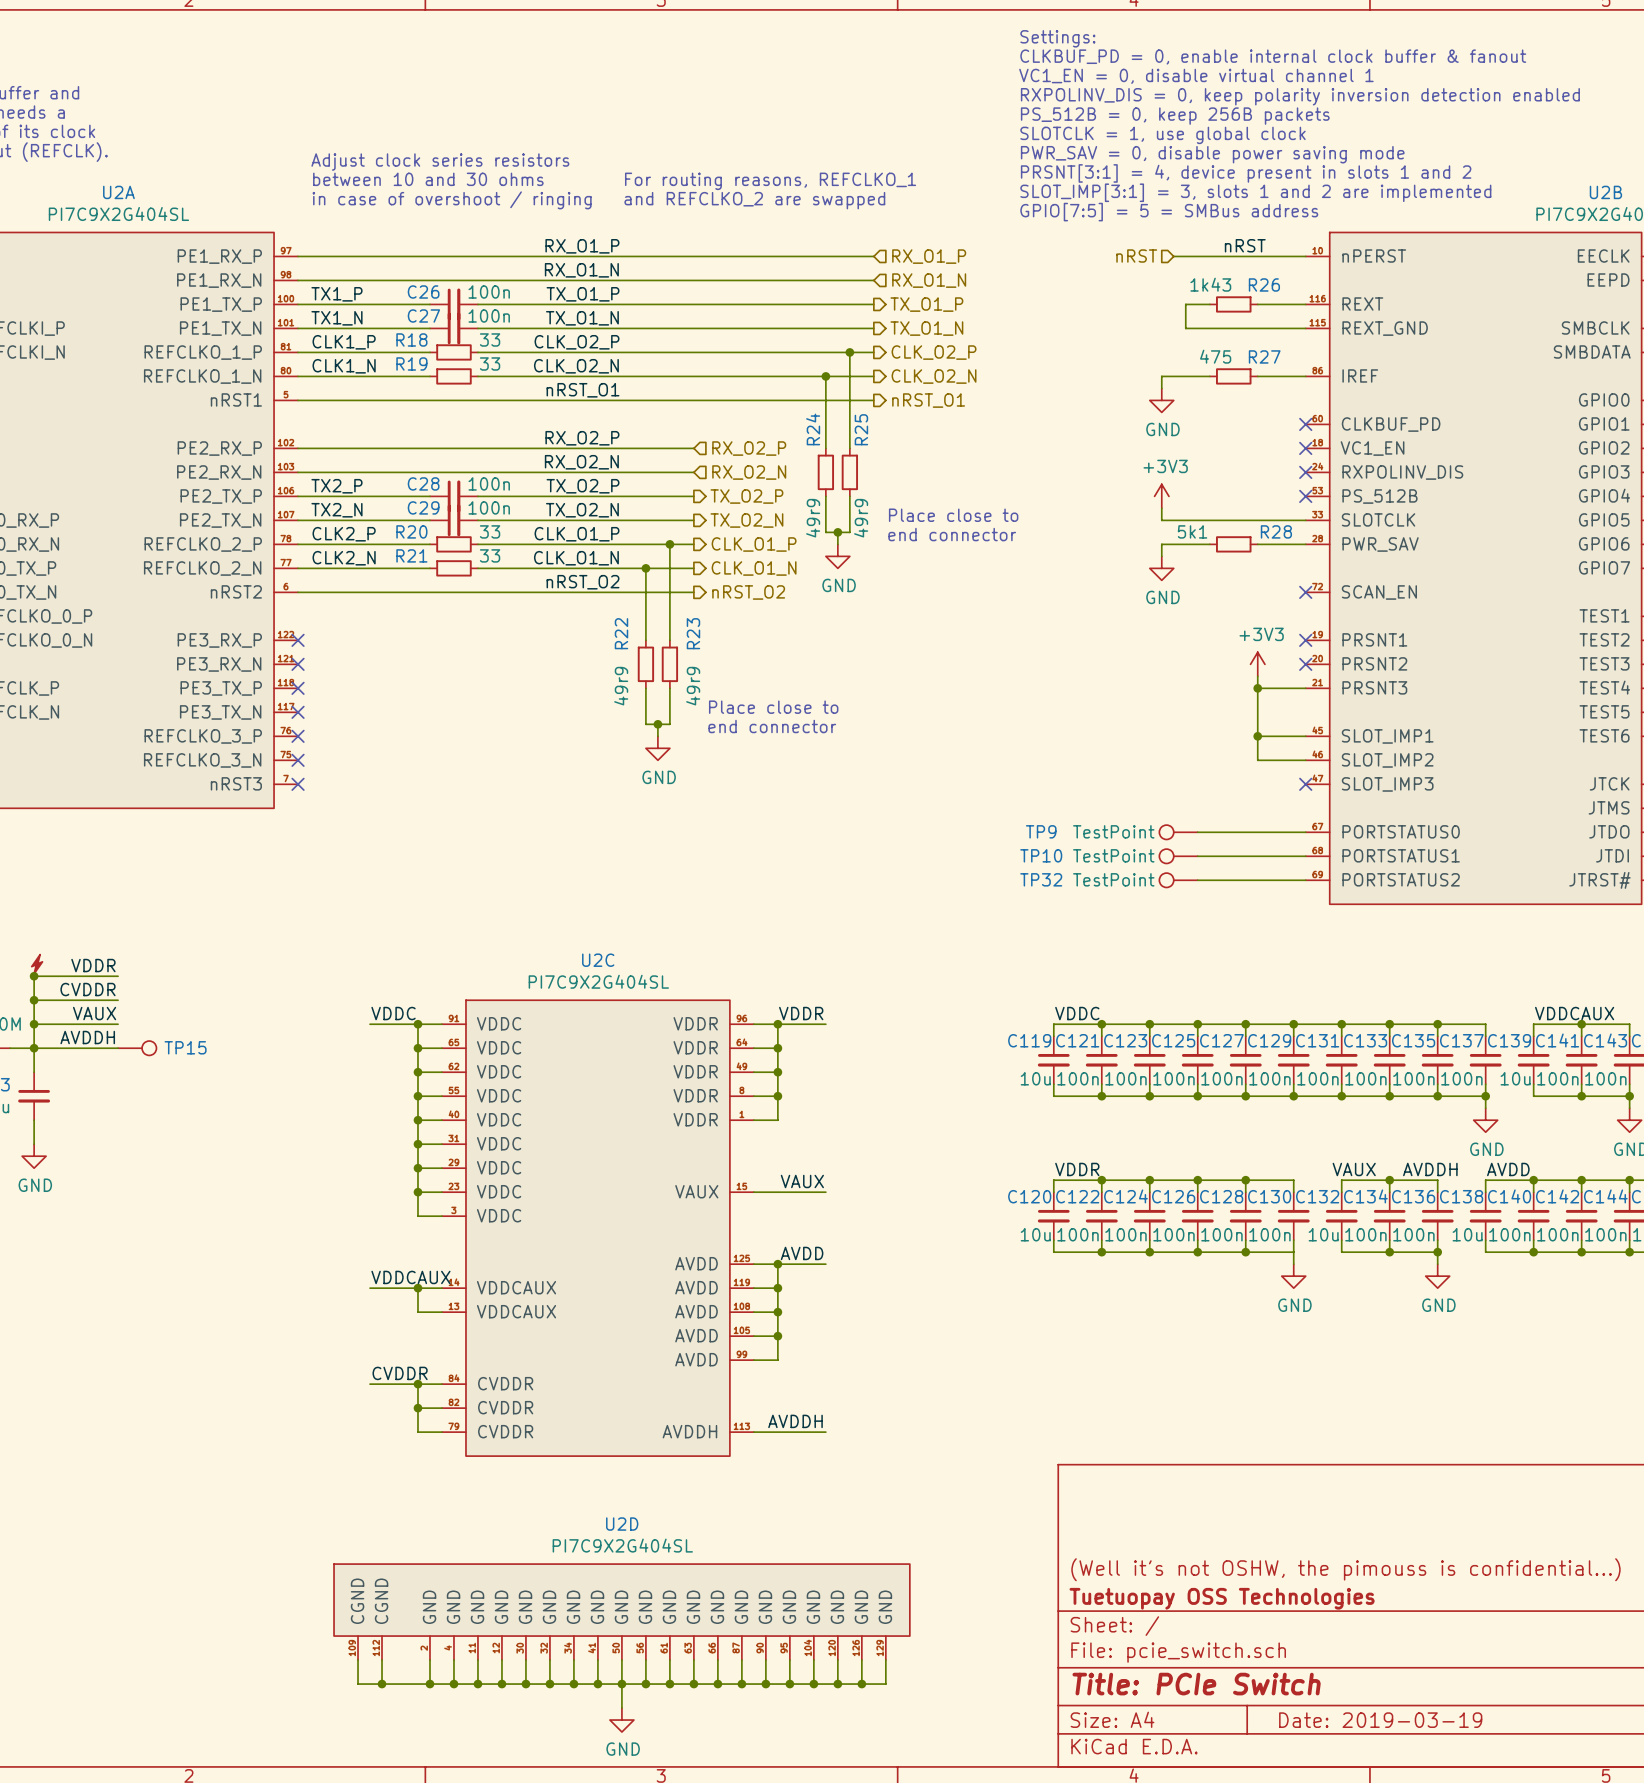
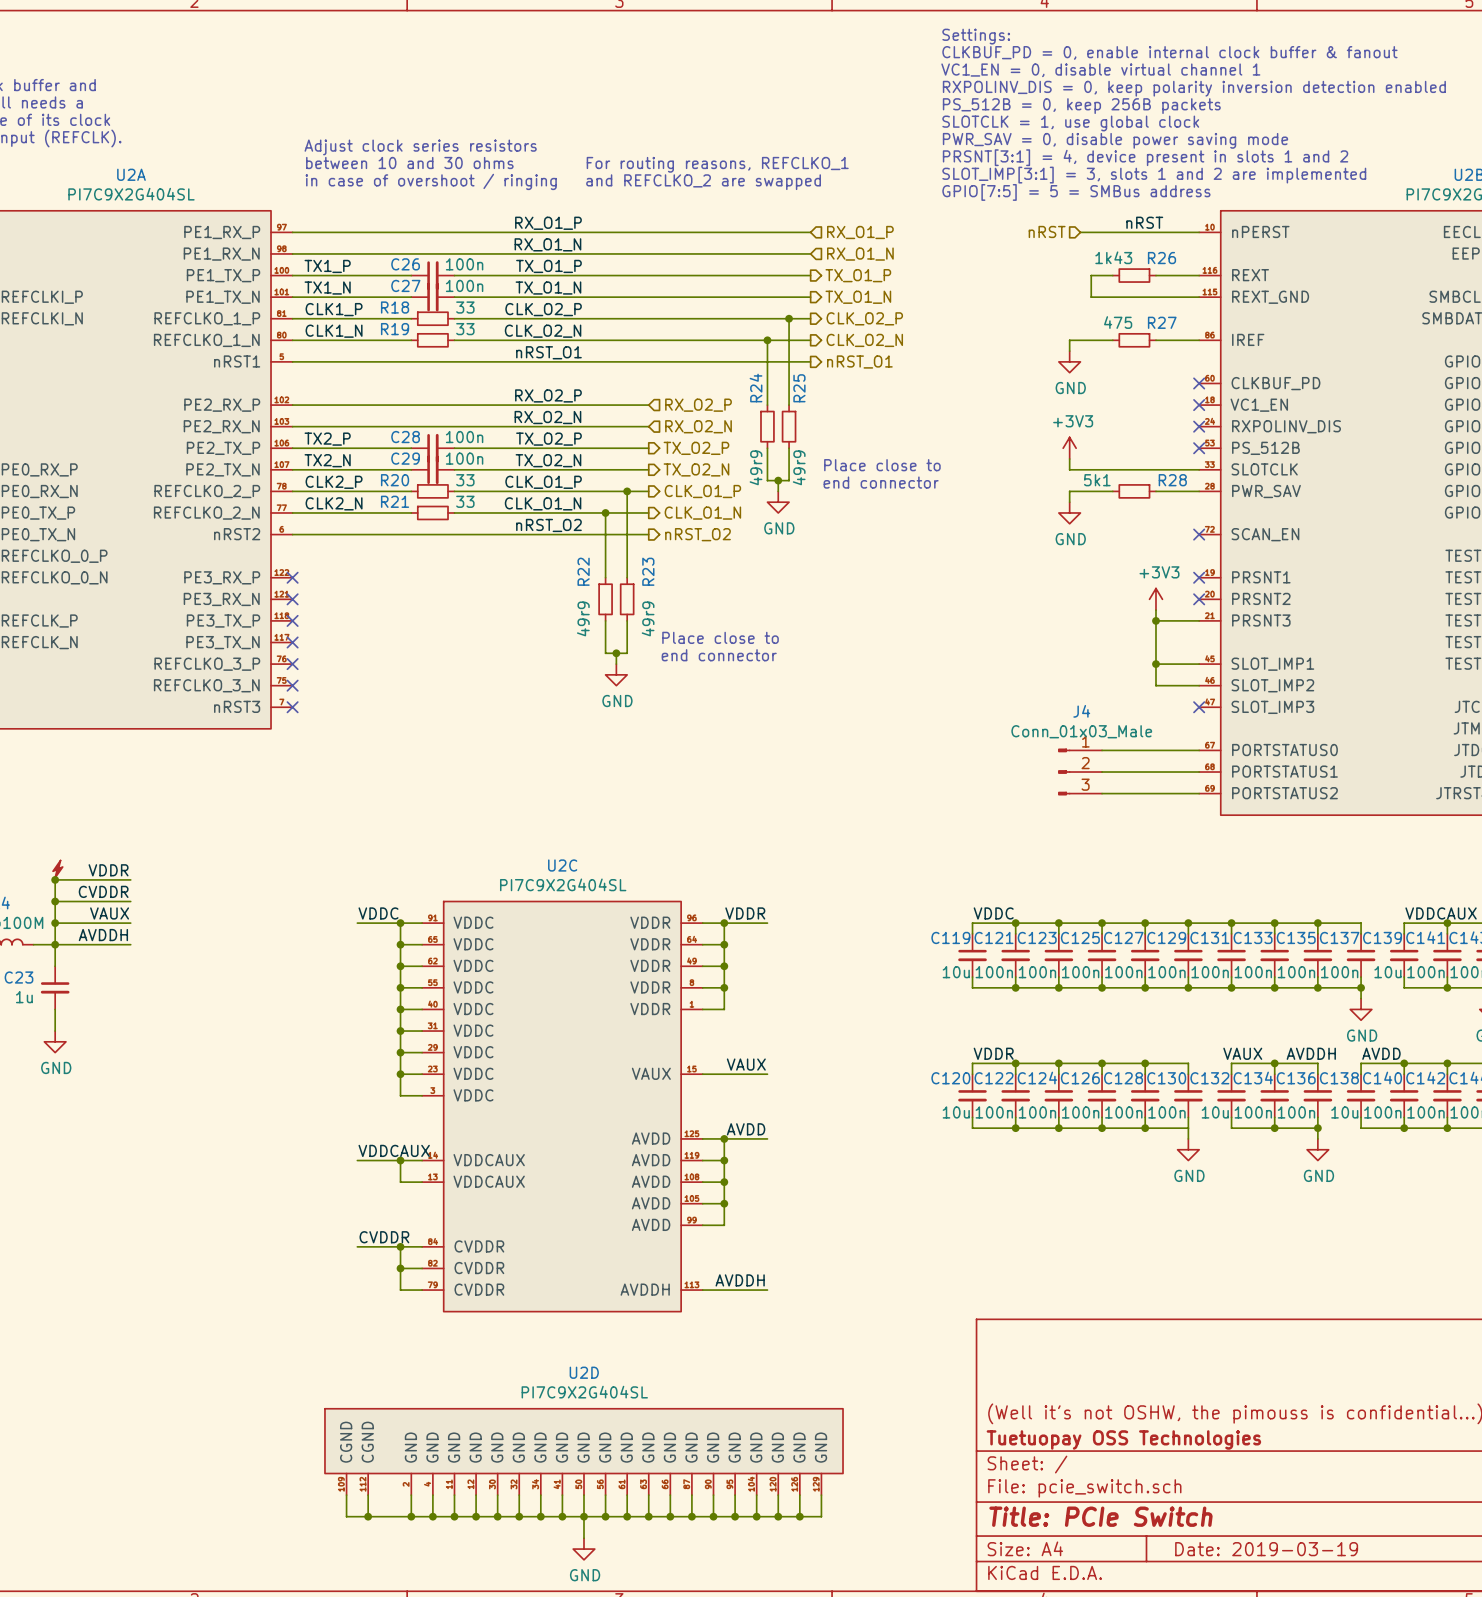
TP9: TestPoint (1178, 832) -> none
J4: none -> Conn_01x03_Male (1080, 772)
TP10: TestPoint (1178, 856) -> none
TP32: TestPoint (1178, 880) -> none
TP15: (137, 1048) -> none

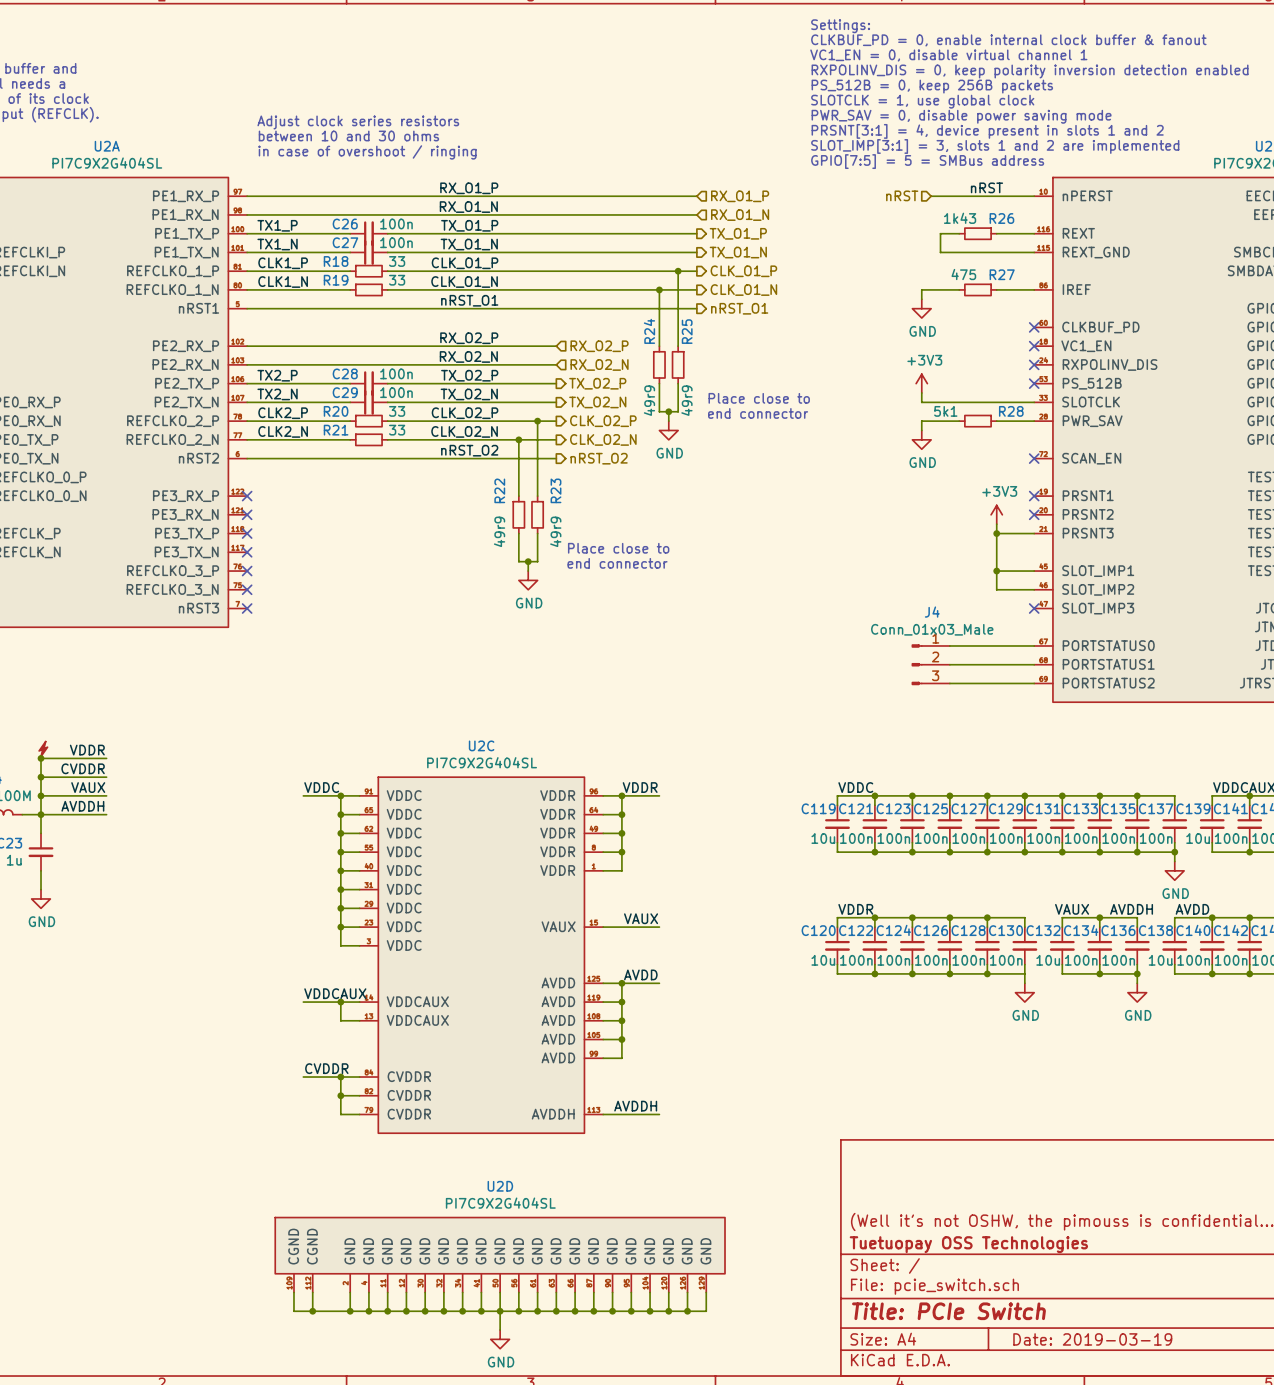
text: For routing reasons, REFCLKO_1 (717, 164) -> none
text: and REFCLKO_2 are swapped (703, 182) -> none
label: CLK_O2_P (543, 309) -> CLK_O1_P (465, 263)
hierarchical label: CLK_O2_P (864, 318) -> CLK_O1_P (743, 271)
label: CLK_O2_N (543, 331) -> CLK_O1_N (464, 282)
hierarchical label: CLK_O2_N (864, 340) -> CLK_O1_N (743, 290)
label: CLK_O1_P (543, 482) -> CLK_O2_P (465, 413)
hierarchical label: CLK_O1_P (702, 491) -> CLK_O2_P (603, 421)
label: CLK_O1_N (543, 503) -> CLK_O2_N (464, 431)
hierarchical label: CLK_O1_N (702, 513) -> CLK_O2_N (603, 439)

